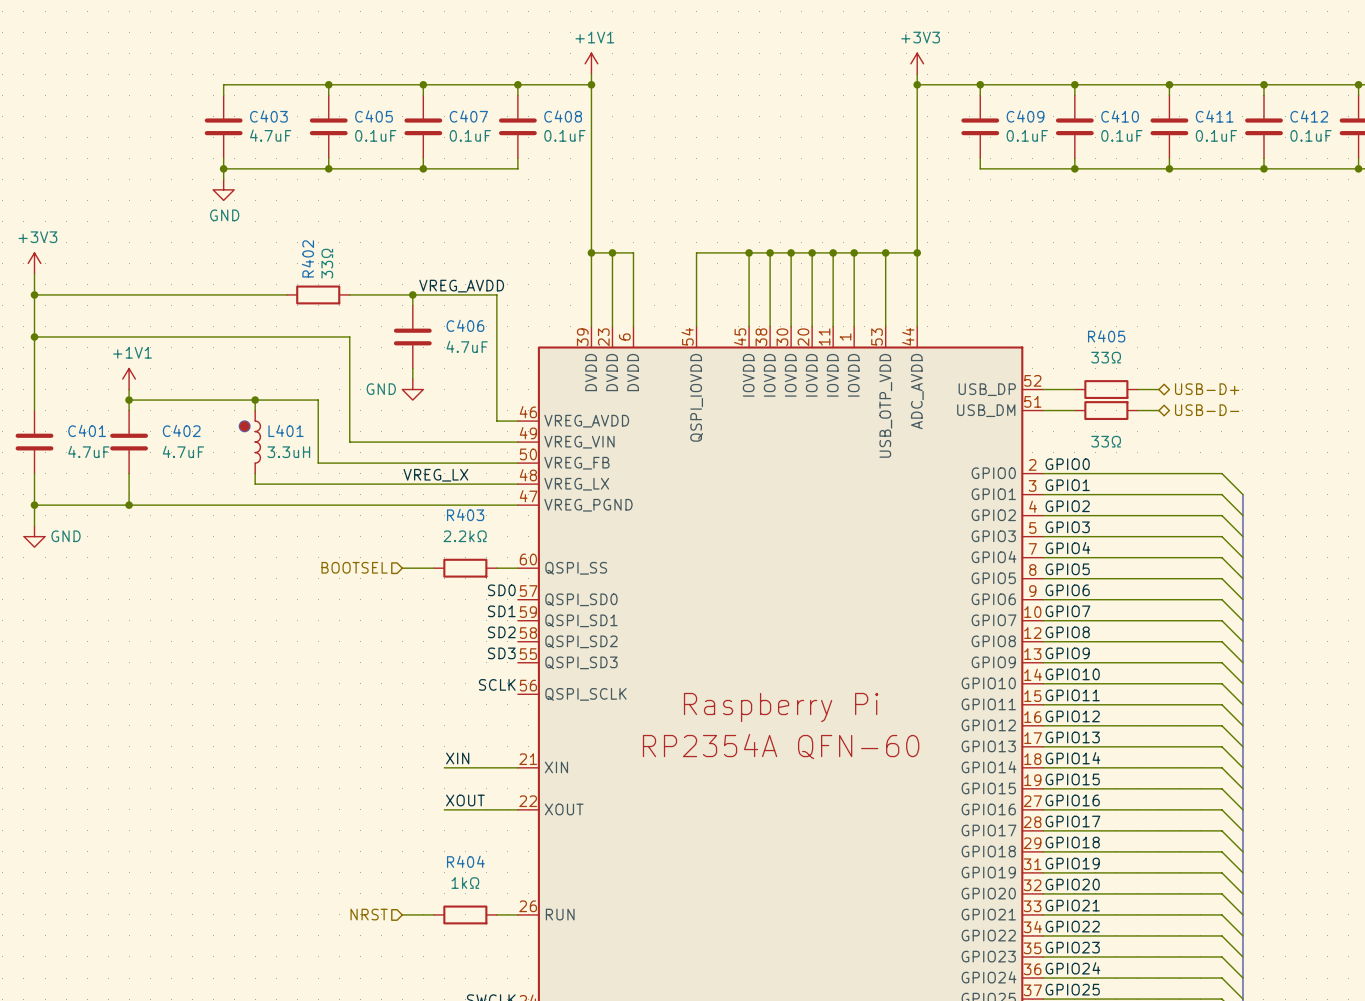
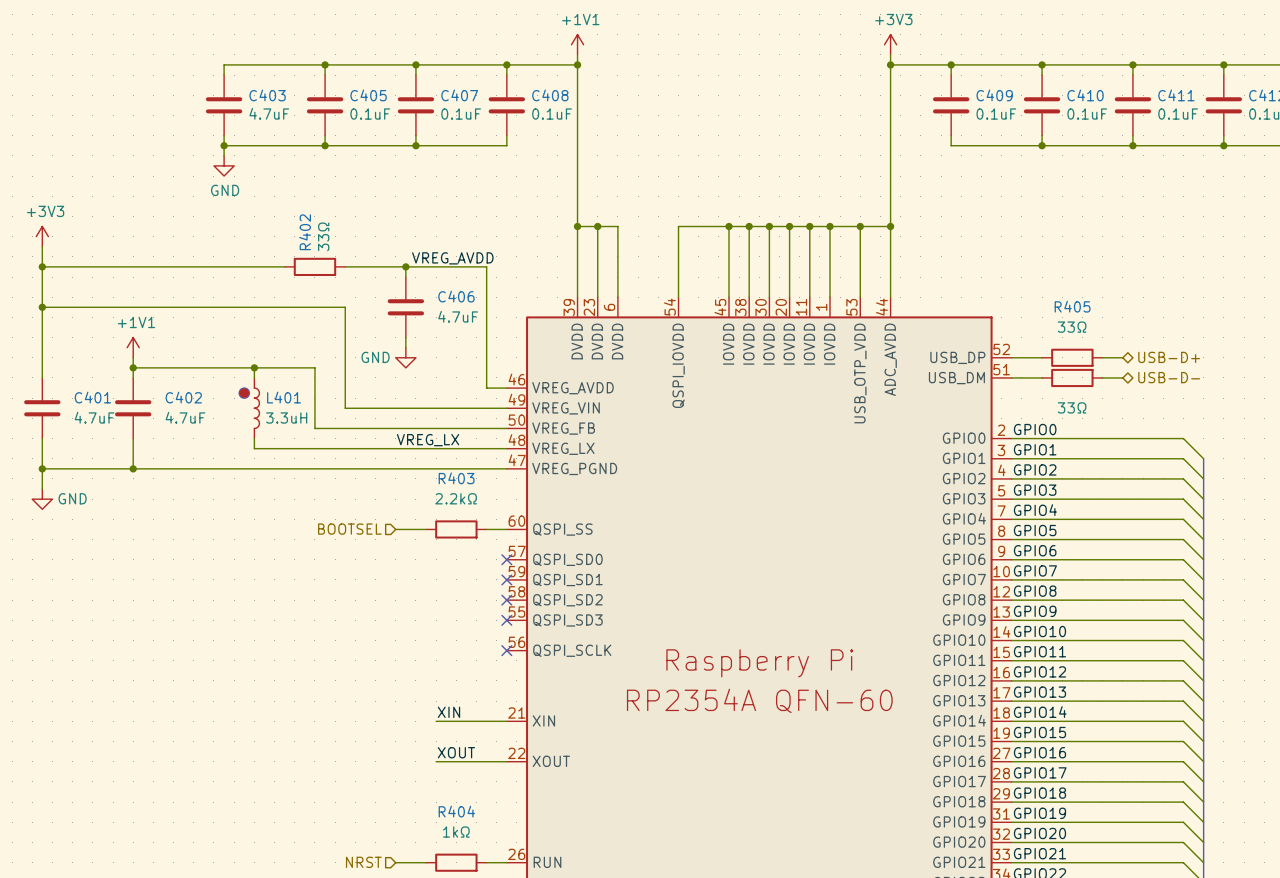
label: SD0 (501, 590) -> none
no-connect mark: none -> (506, 559)
label: SD1 (501, 611) -> none
no-connect mark: none -> (506, 579)
label: SD2 (501, 632) -> none
no-connect mark: none -> (506, 600)
label: SD3 (501, 653) -> none
no-connect mark: none -> (506, 620)
label: SCLK (497, 684) -> none
no-connect mark: none -> (506, 650)

